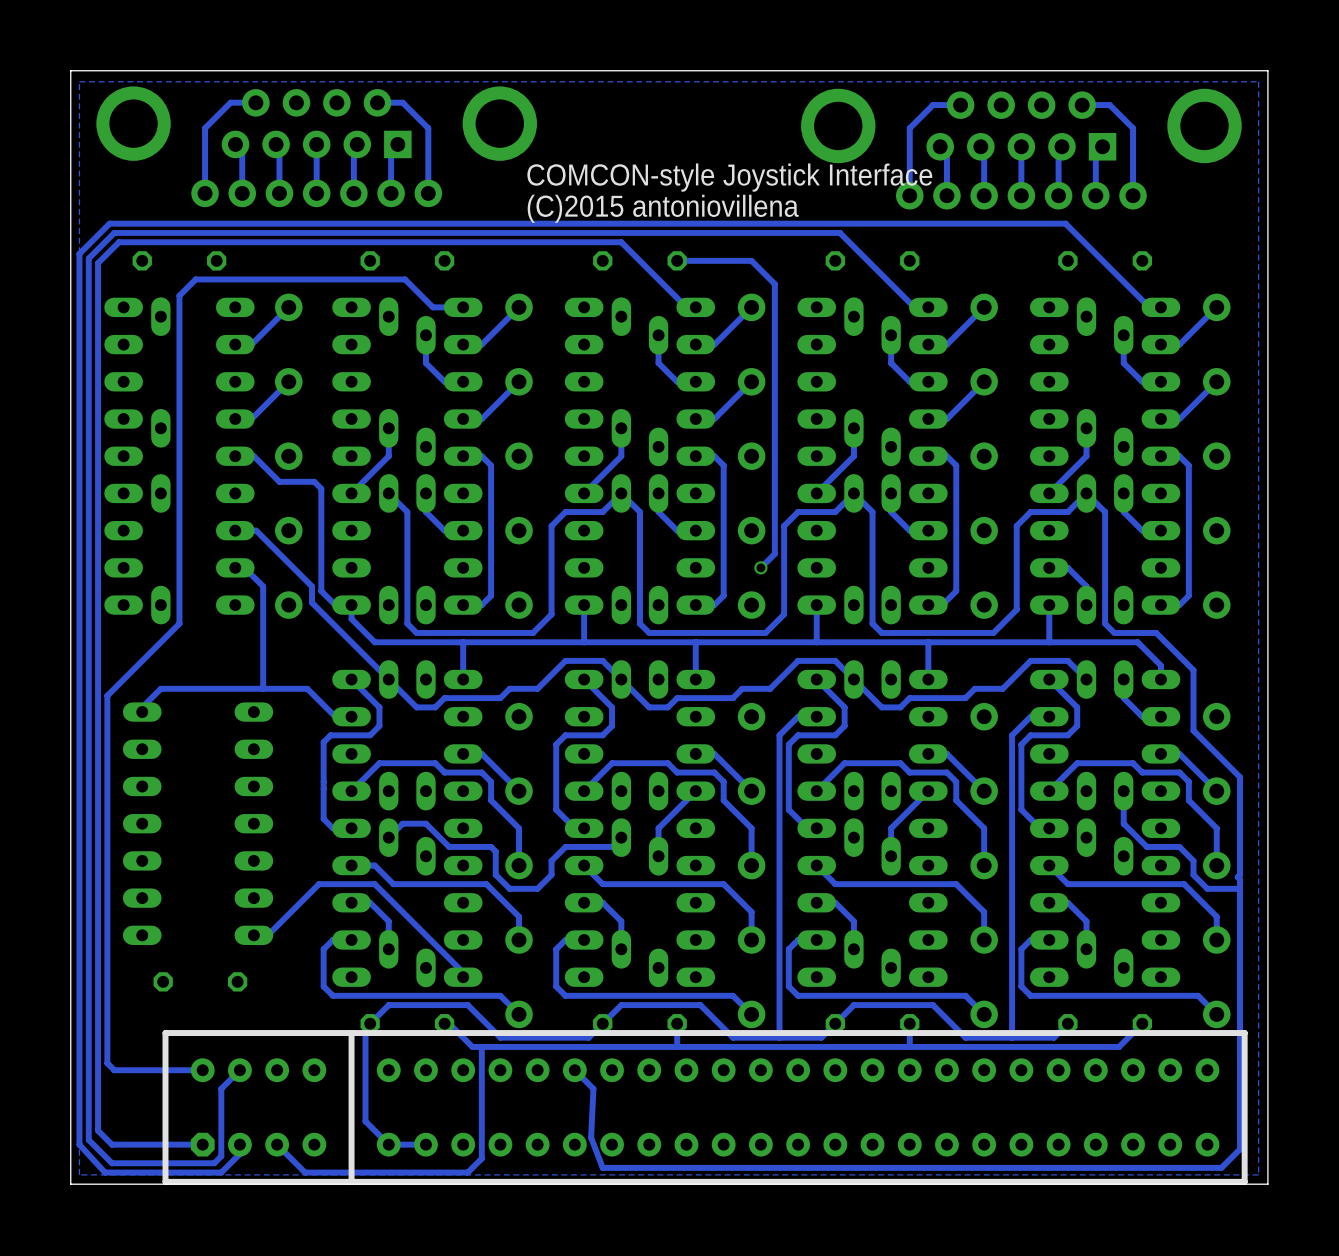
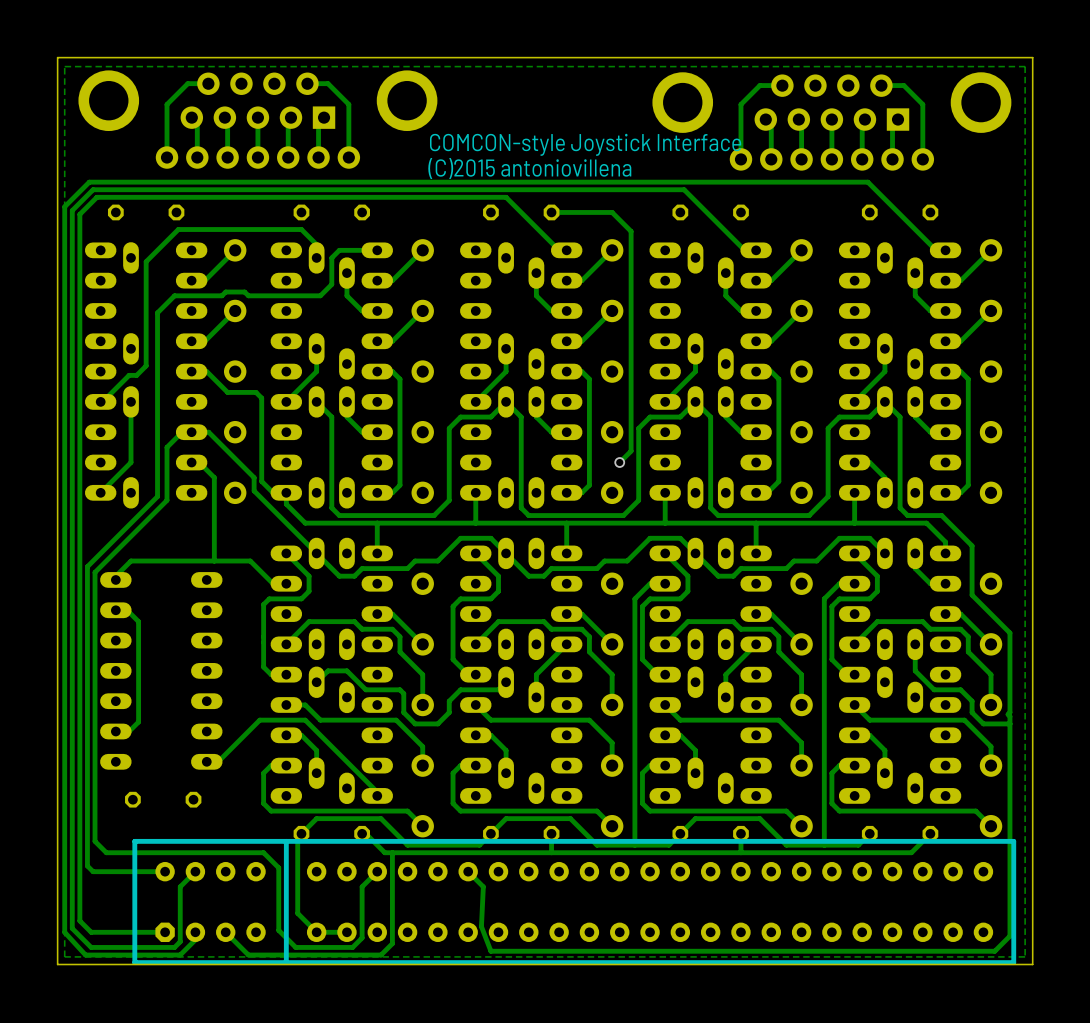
track: (432, 307) (405, 279) (195, 279) (179, 295) (179, 321) -> (316, 257) (316, 244) (301, 229) (178, 229) (146, 261)
track: none -> (352, 250) (339, 250) (331, 257) (331, 284) (320, 295) (248, 295) (244, 292) (225, 292) (221, 295) (174, 295) (157, 312) (157, 496) (146, 507)
track: (179, 449) (179, 623) -> (146, 365) (136, 375) (129, 375) (100, 401)
track: none -> (131, 401) (131, 462) (100, 492)
track: none -> (191, 432) (182, 432) (167, 447) (167, 500) (95, 572) (95, 841) (106, 852) (263, 852) (278, 867) (278, 930) (295, 947) (352, 947) (362, 937) (362, 886) (377, 871)
track: none -> (115, 610) (127, 610) (138, 621) (138, 722) (129, 731) (115, 731)

